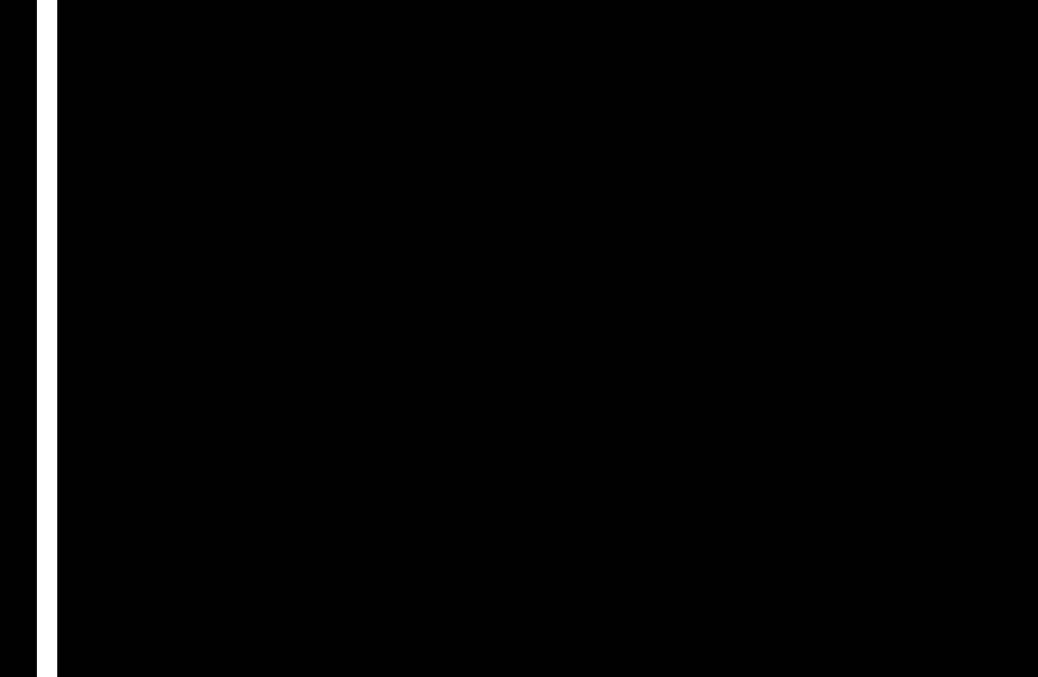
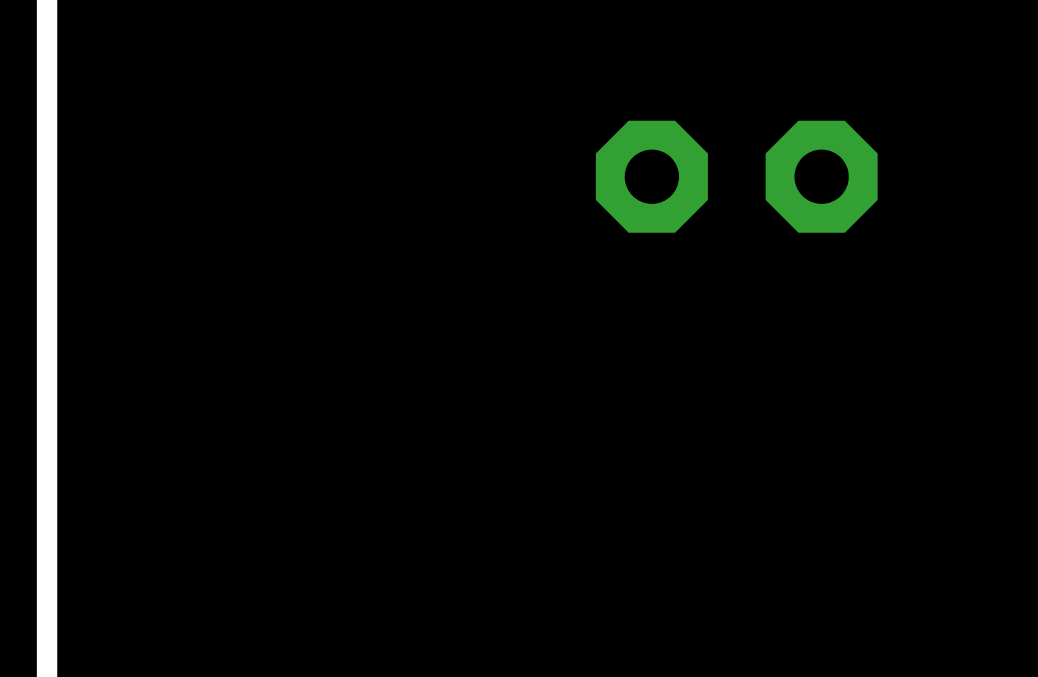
part: none -> (736, 176)

